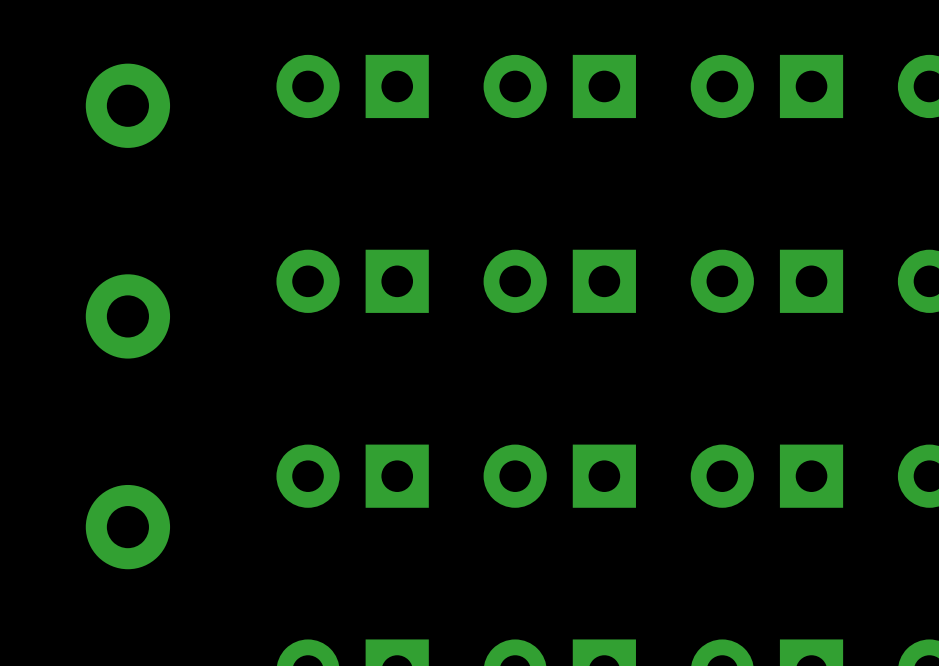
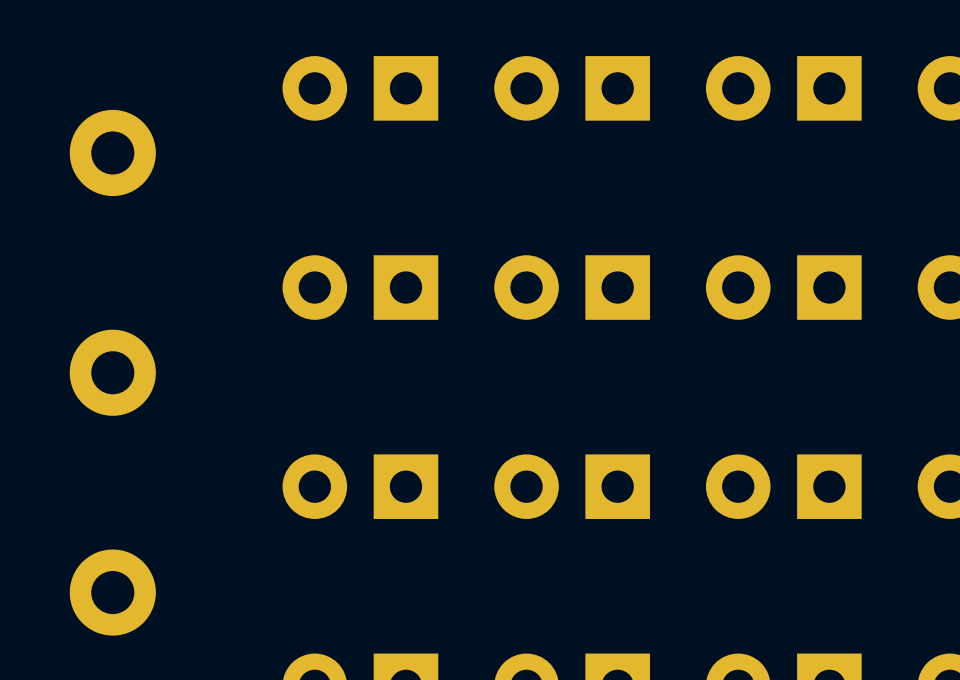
part position: (127, 105) -> (112, 152)
part position: (127, 316) -> (112, 372)
part position: (127, 527) -> (112, 592)

